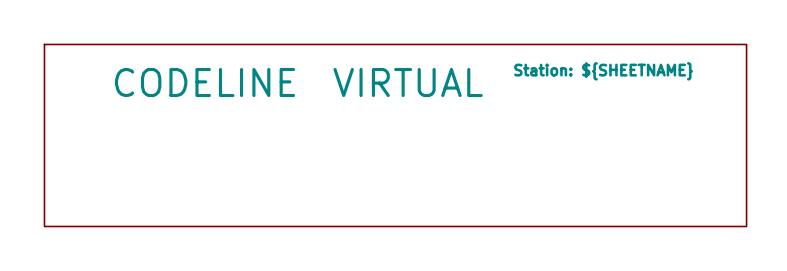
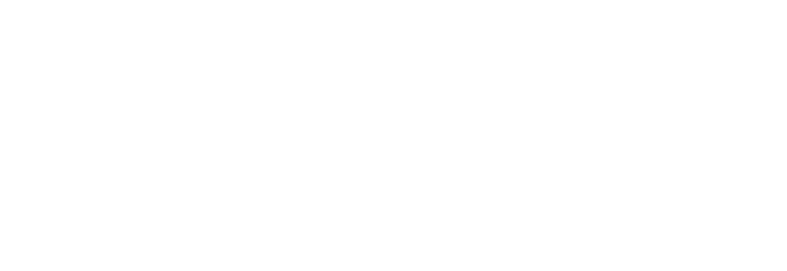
part: VIRTUAL (395, 135) -> none

